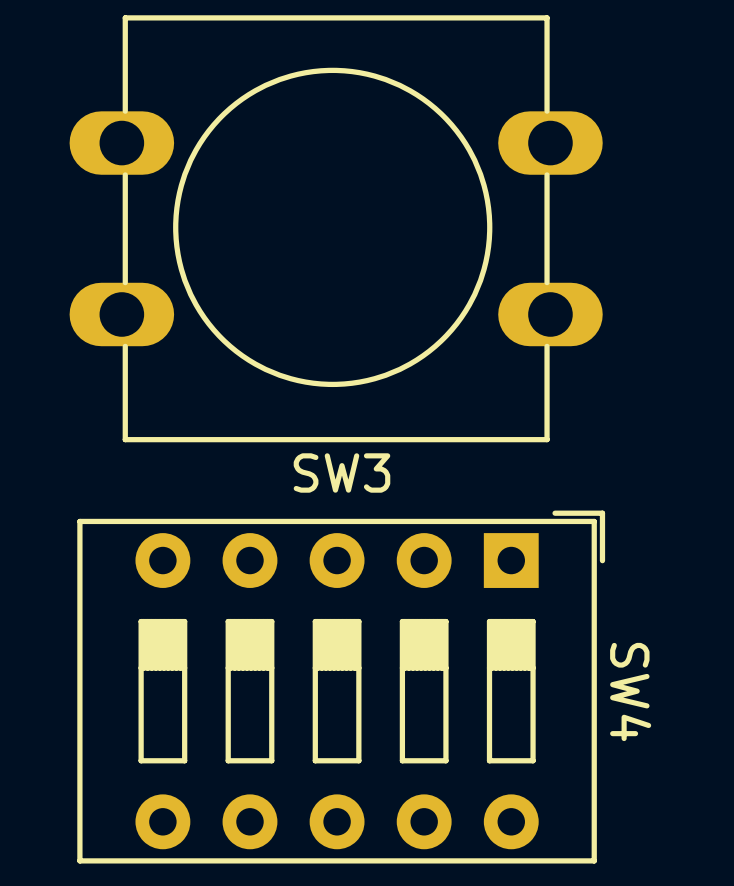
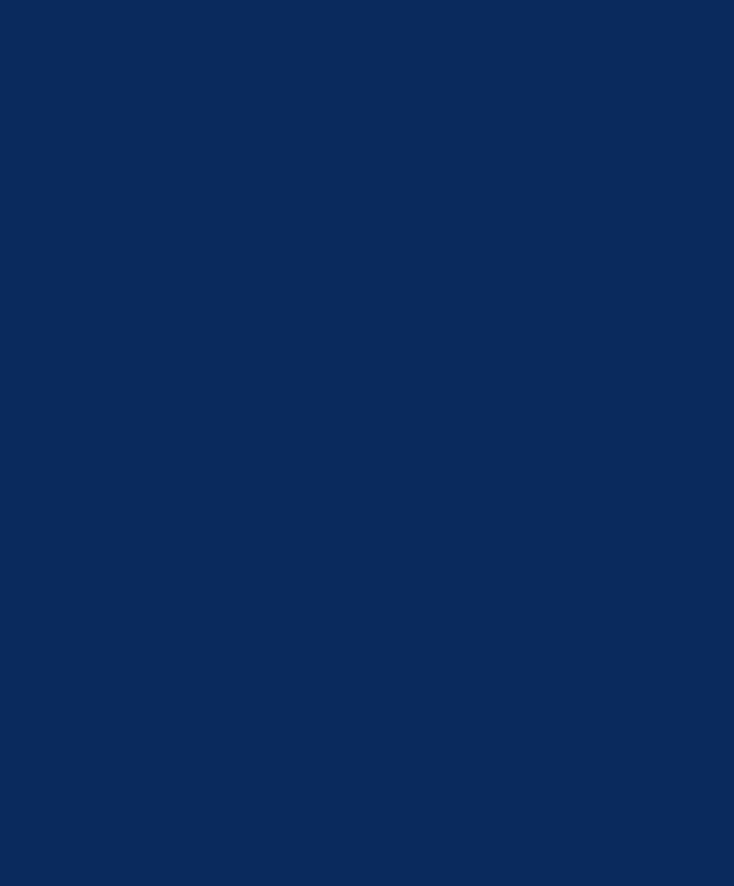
SW3: (336, 228) -> none
SW4: (341, 687) -> none

